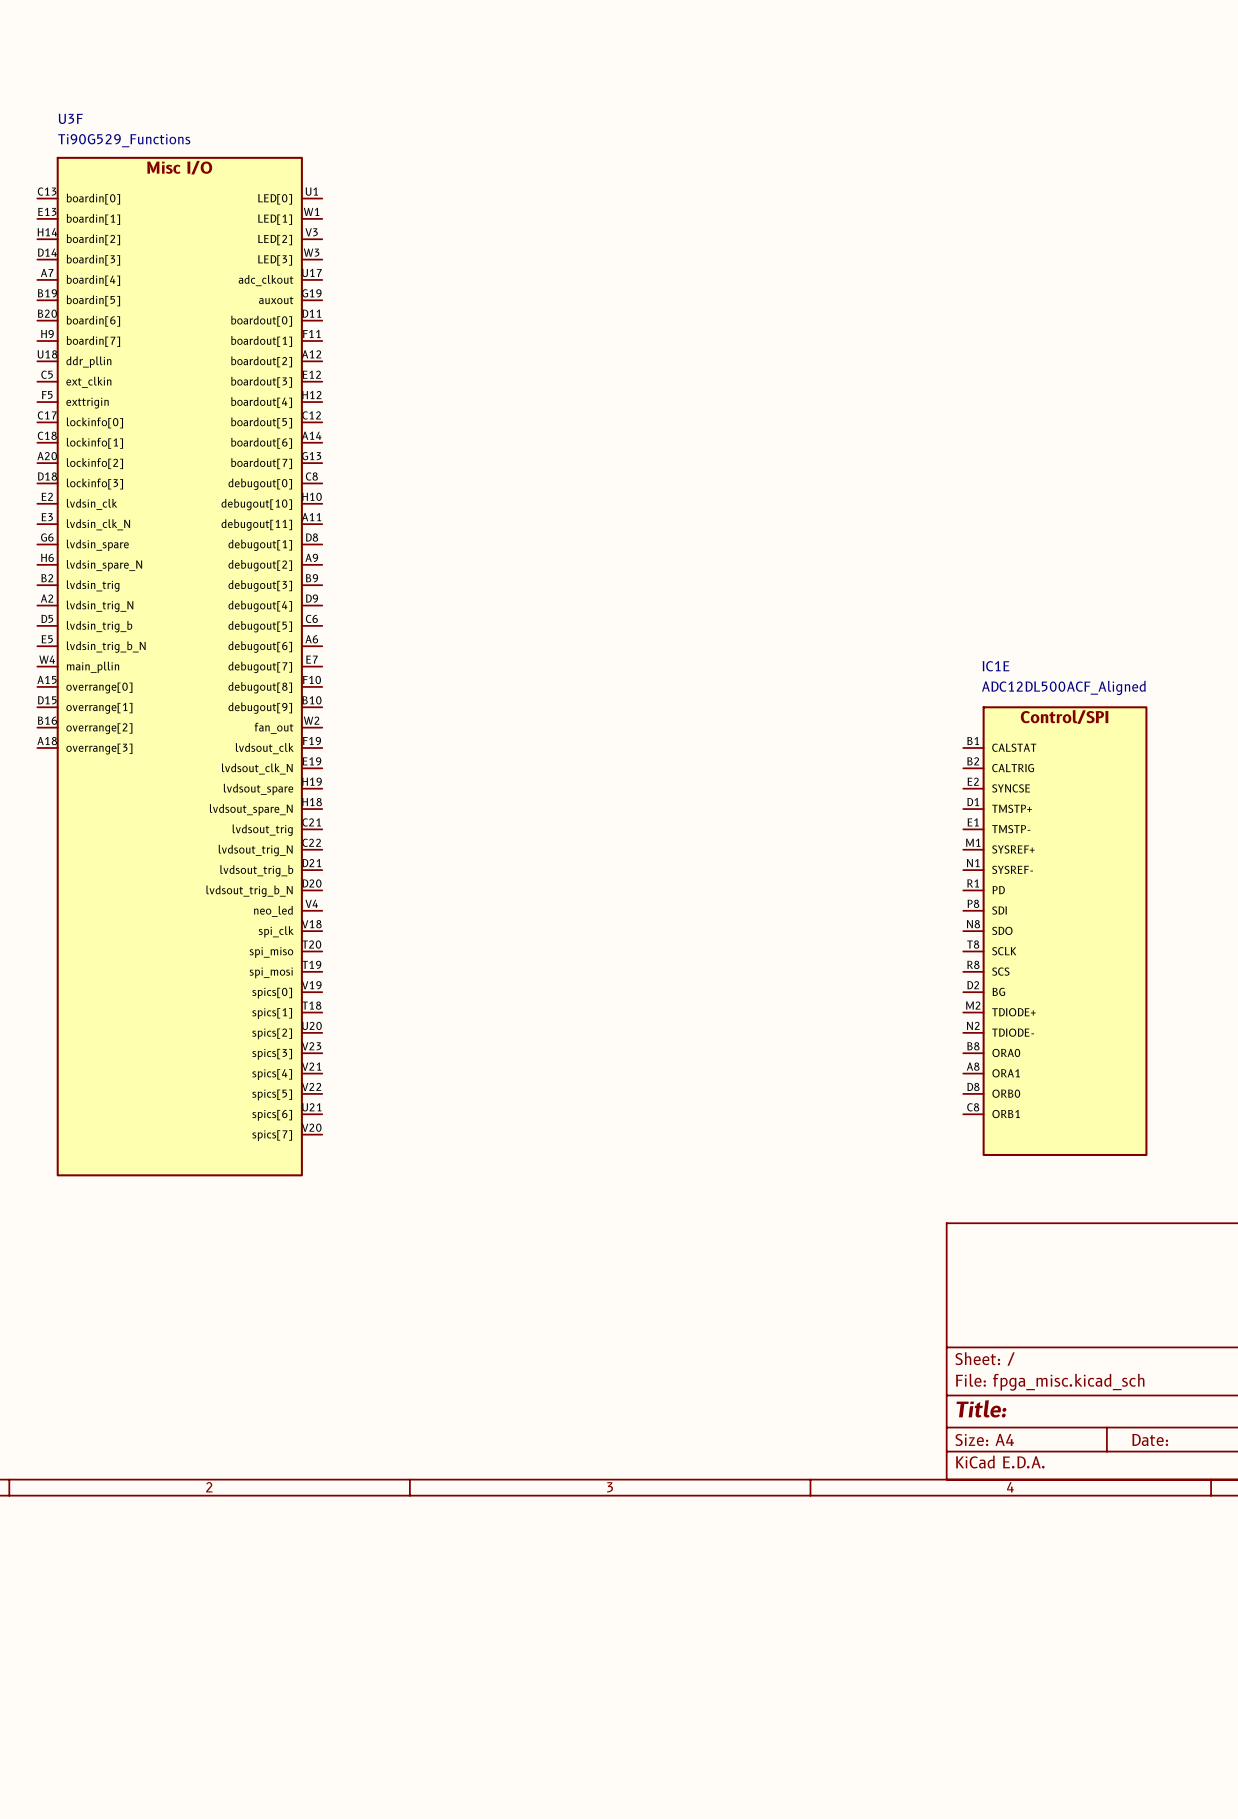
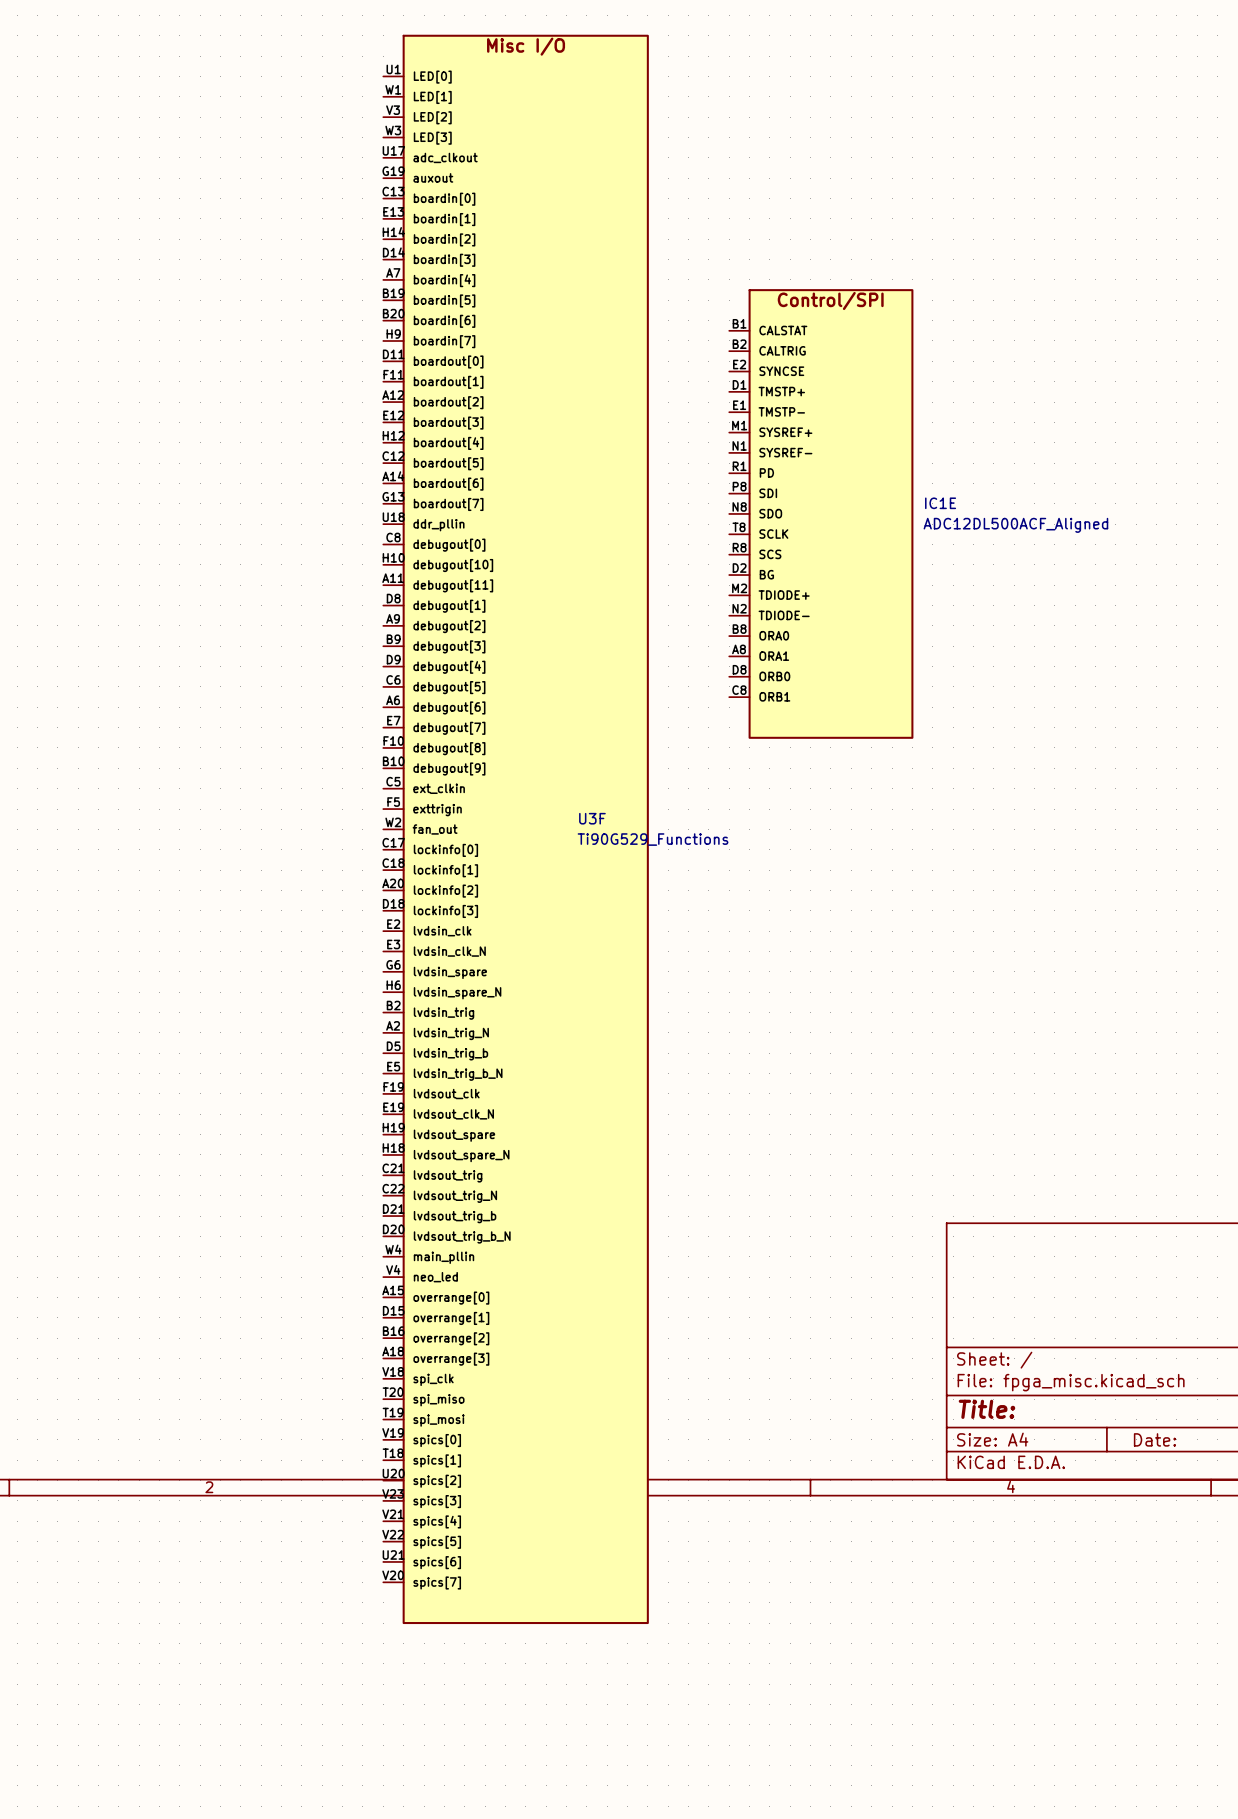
U3F name position: U3F (70, 118) -> U3F (592, 818)
U3F value position: Ti90G529_Functions (124, 140) -> Ti90G529_Functions (653, 839)
U3F symbol: [37, 156, 323, 1177] -> [383, 34, 649, 1625]
IC1E name position: IC1E (995, 666) -> IC1E (940, 503)
IC1E value position: ADC12DL500ACF_Aligned (1063, 687) -> ADC12DL500ACF_Aligned (1015, 525)
IC1E position: (1055, 931) -> (821, 513)

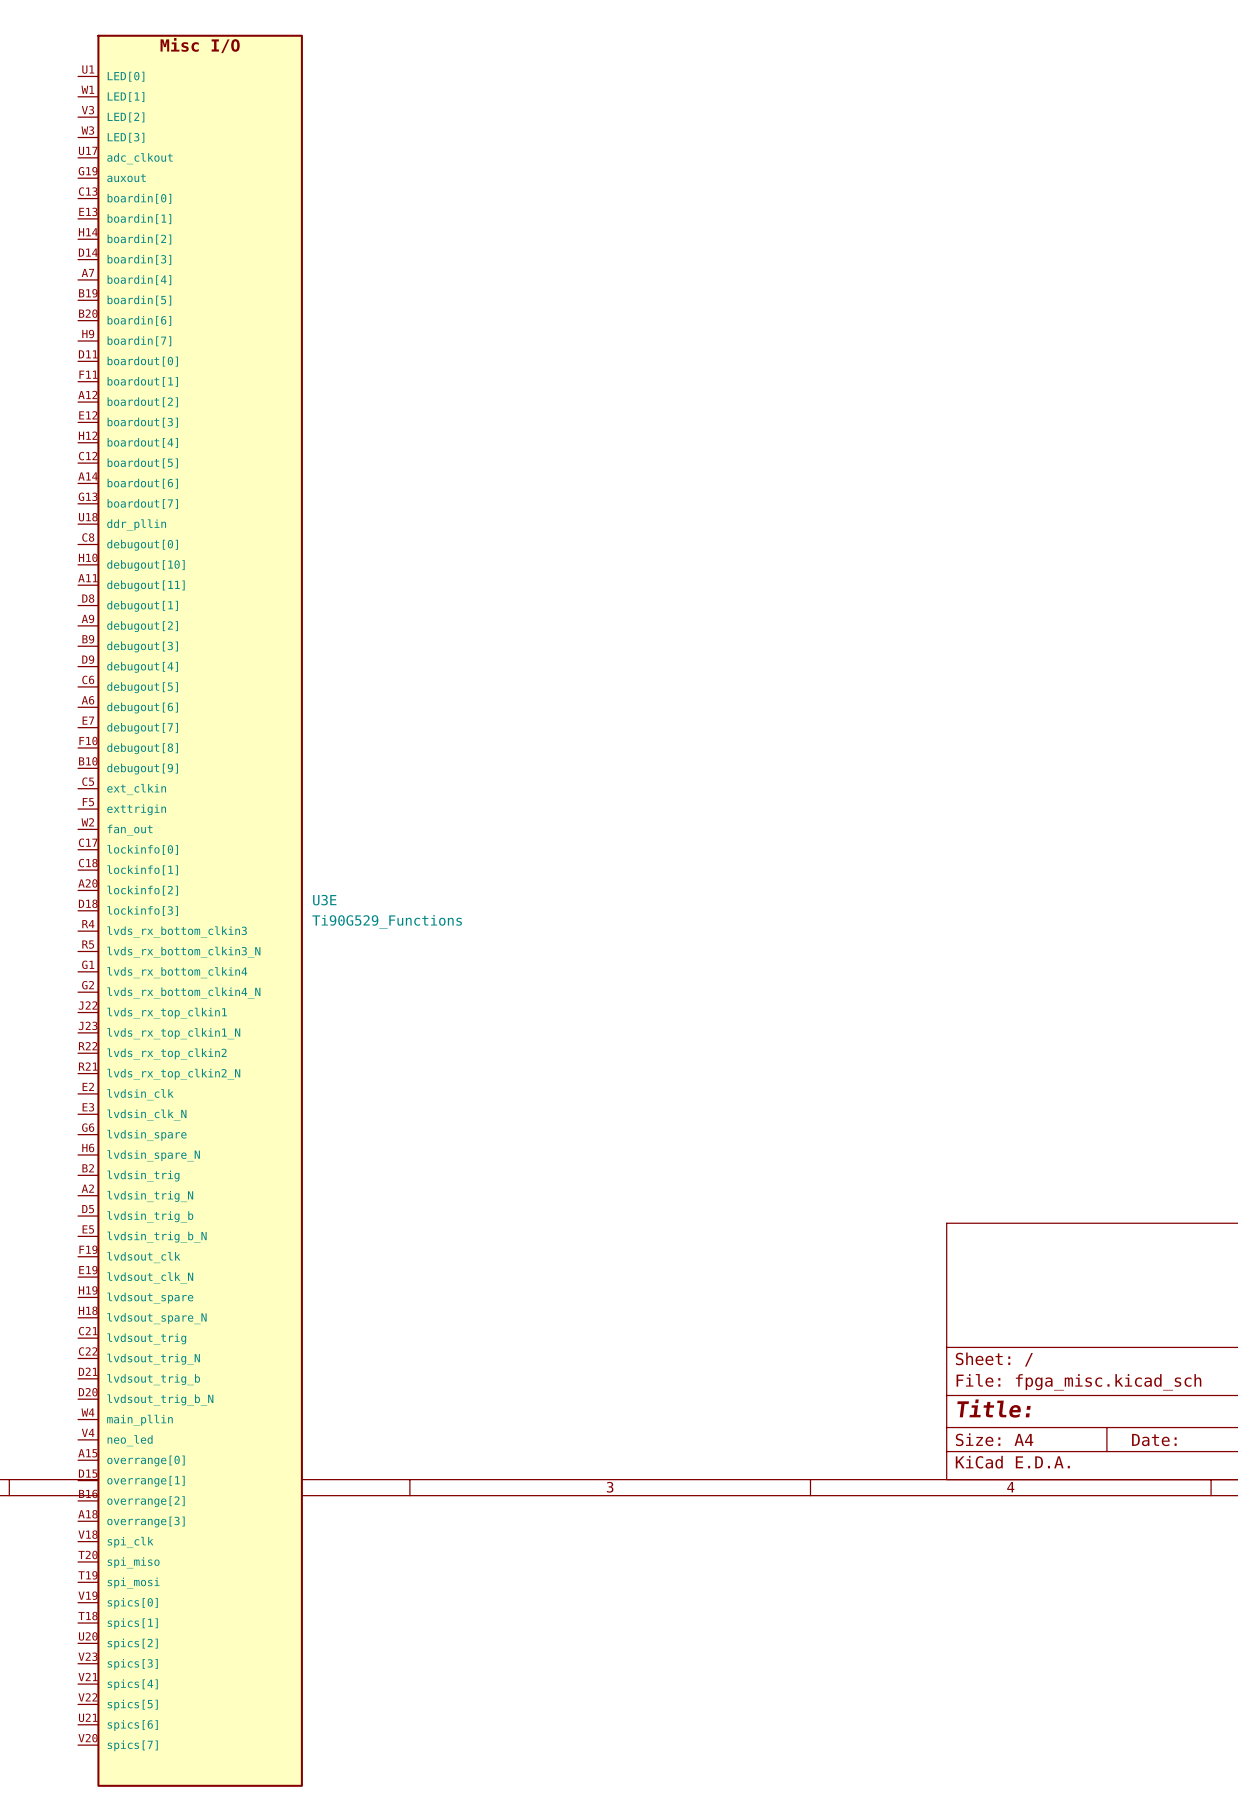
IC1E: ADC12DL500ACF_Aligned (821, 513) -> none
U3F: Ti90G529_Functions (516, 829) -> none
U3E: none -> Ti90G529_Functions (190, 910)

